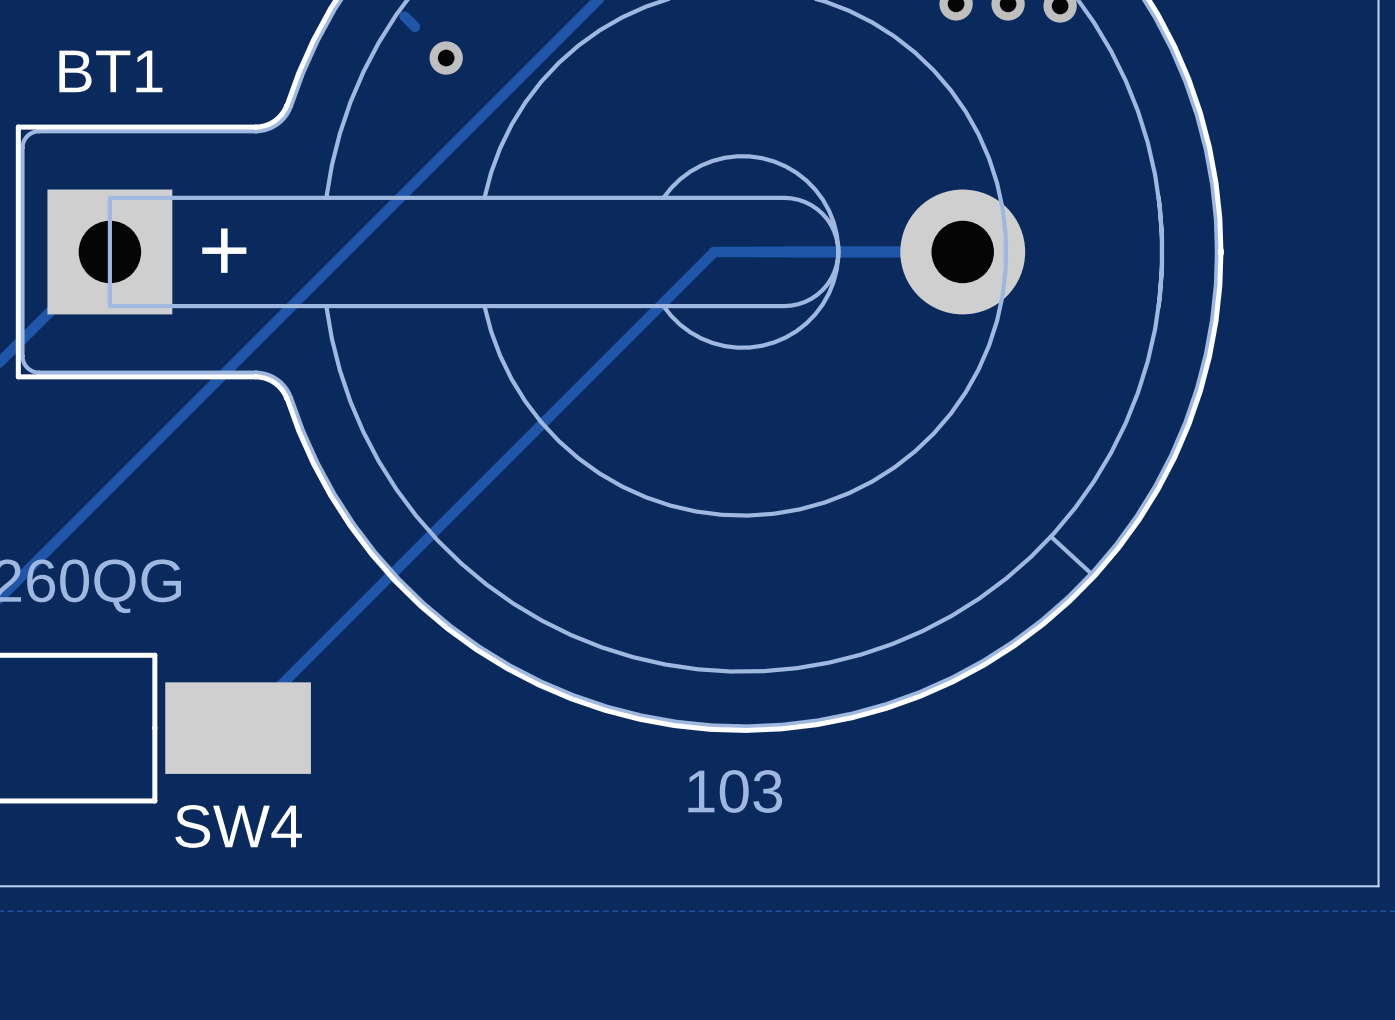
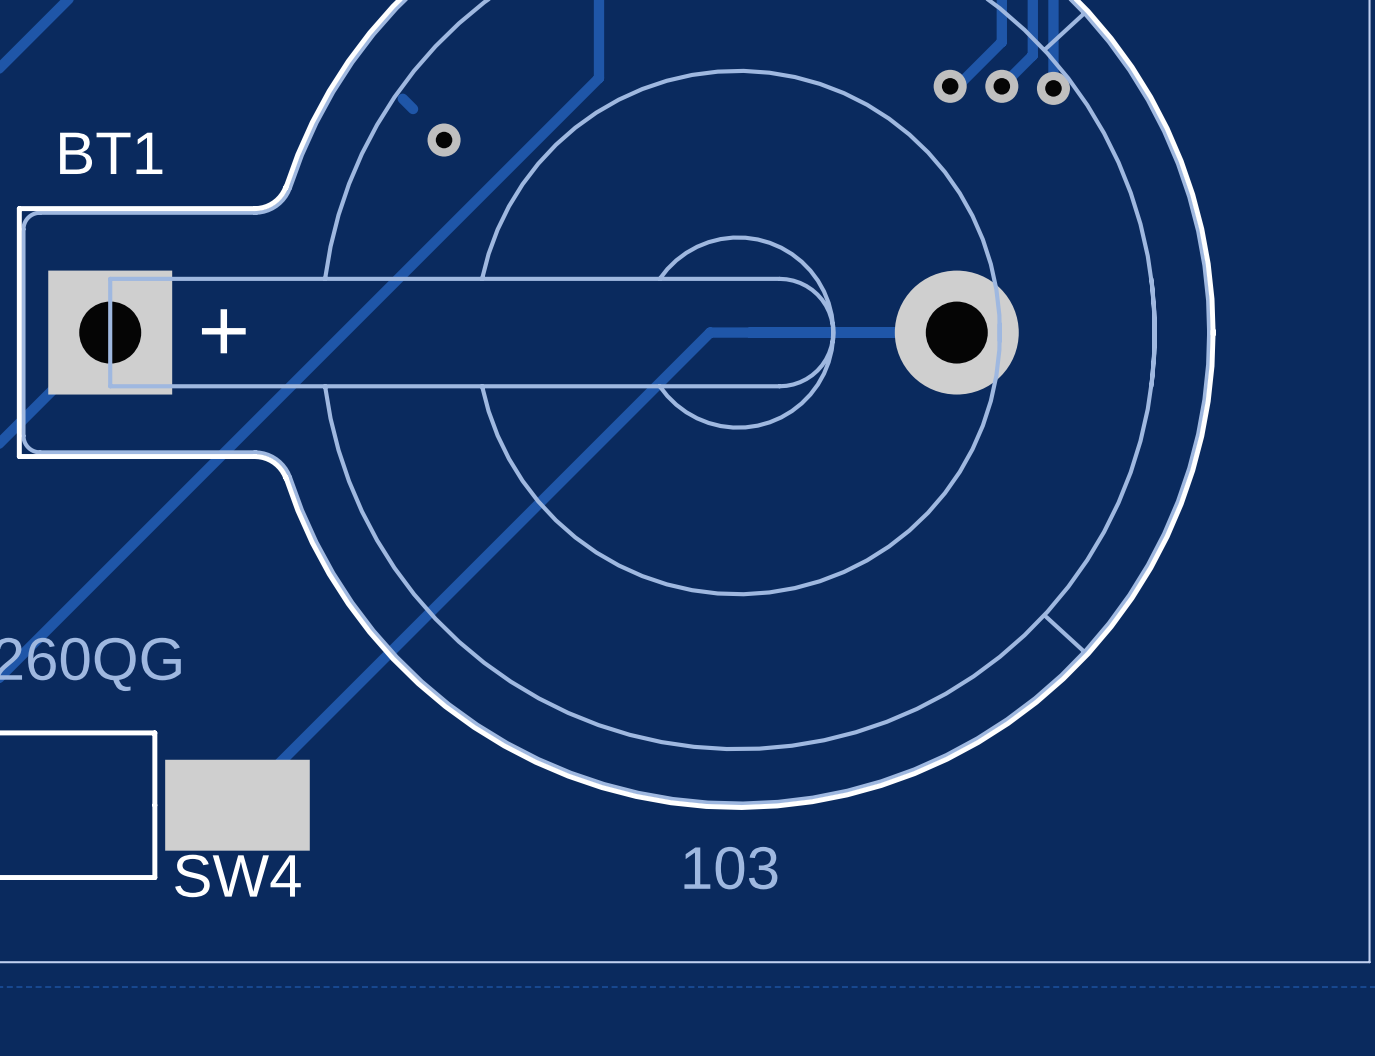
SW4 name position: SW4 (238, 826) -> SW4 (237, 875)

